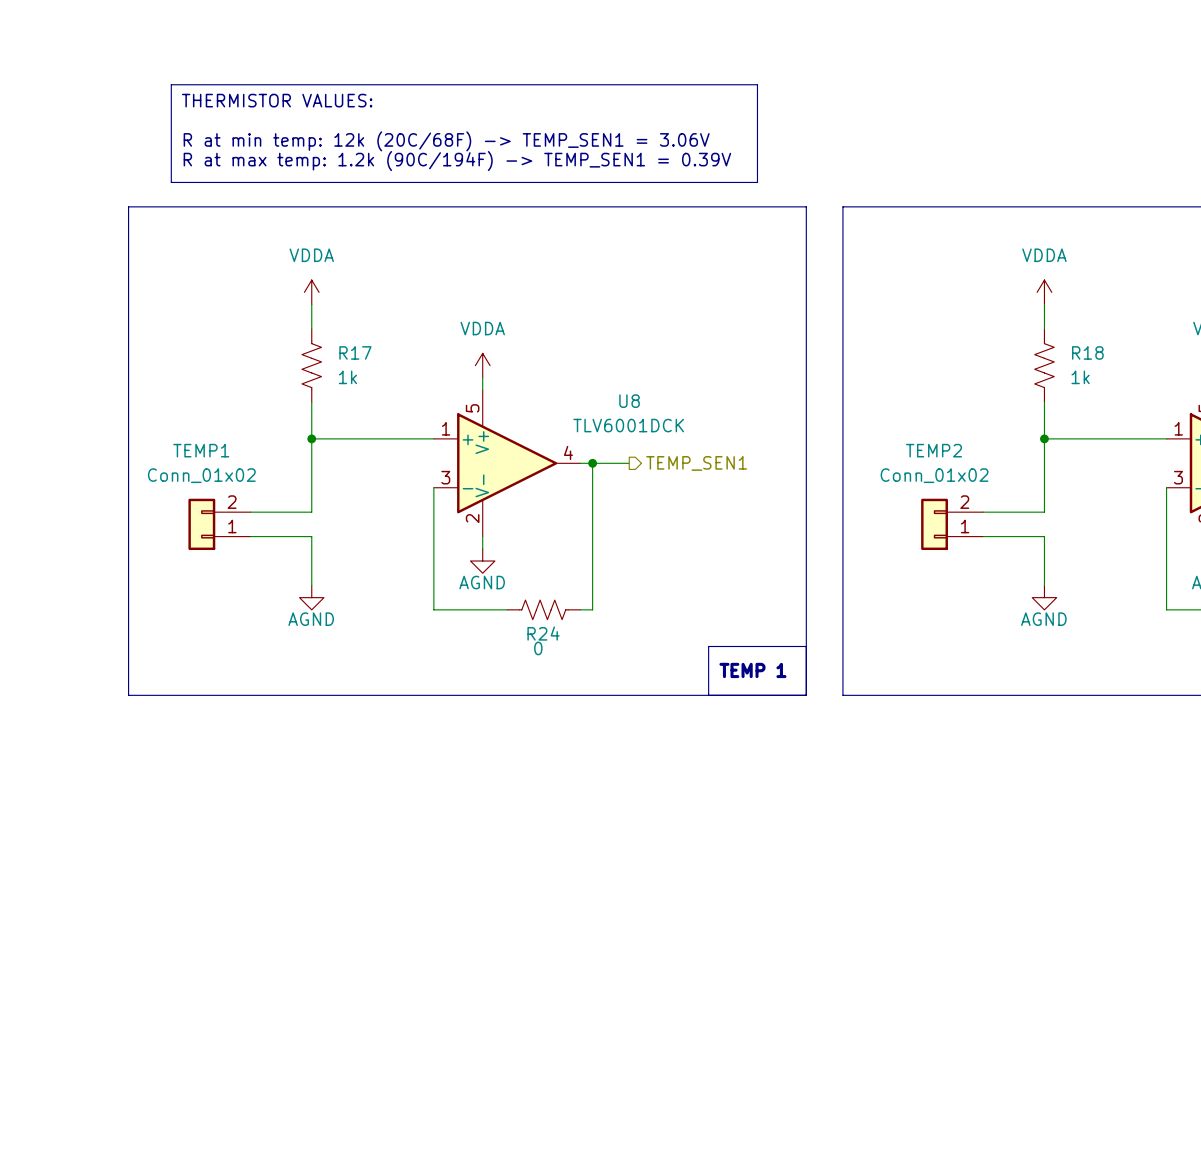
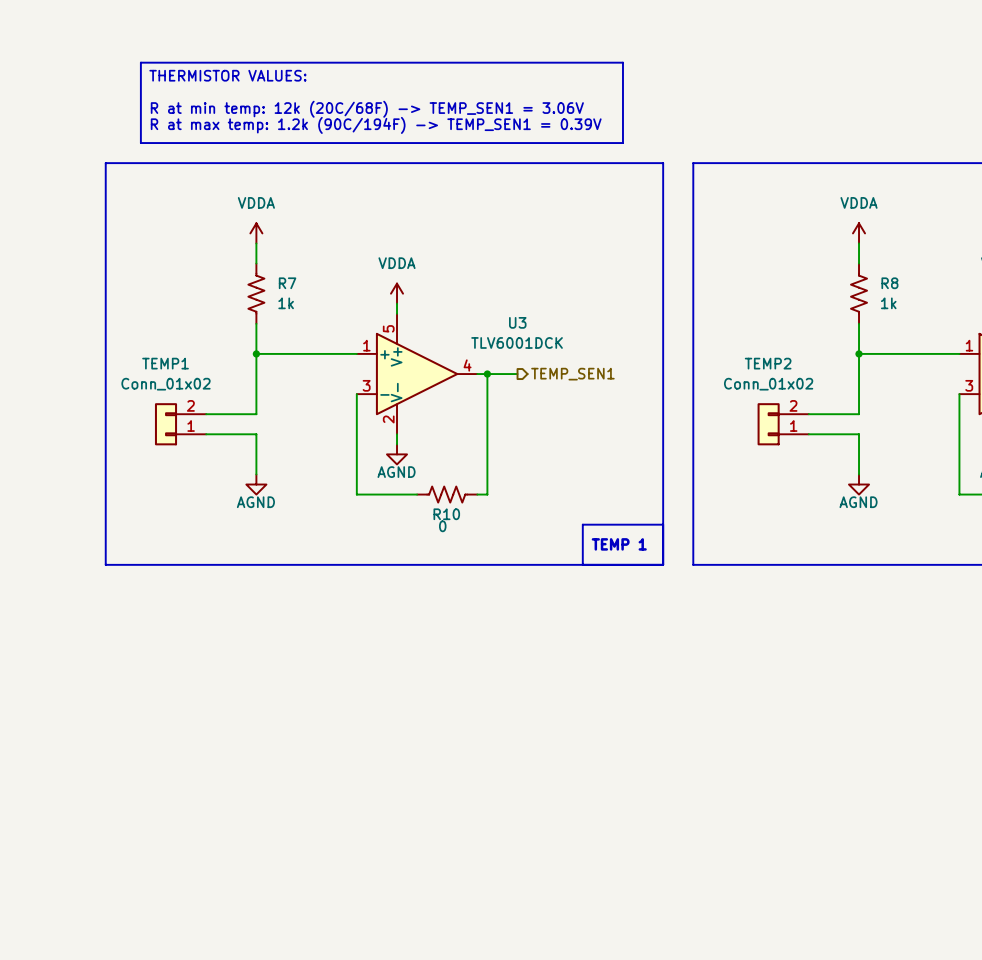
R17 name: R17 (355, 352) -> R7 (287, 283)
R18 name: R18 (1087, 352) -> R8 (889, 283)
U8 name: U8 (629, 401) -> U3 (517, 322)
R24 name: R24 (543, 633) -> R10 (446, 514)

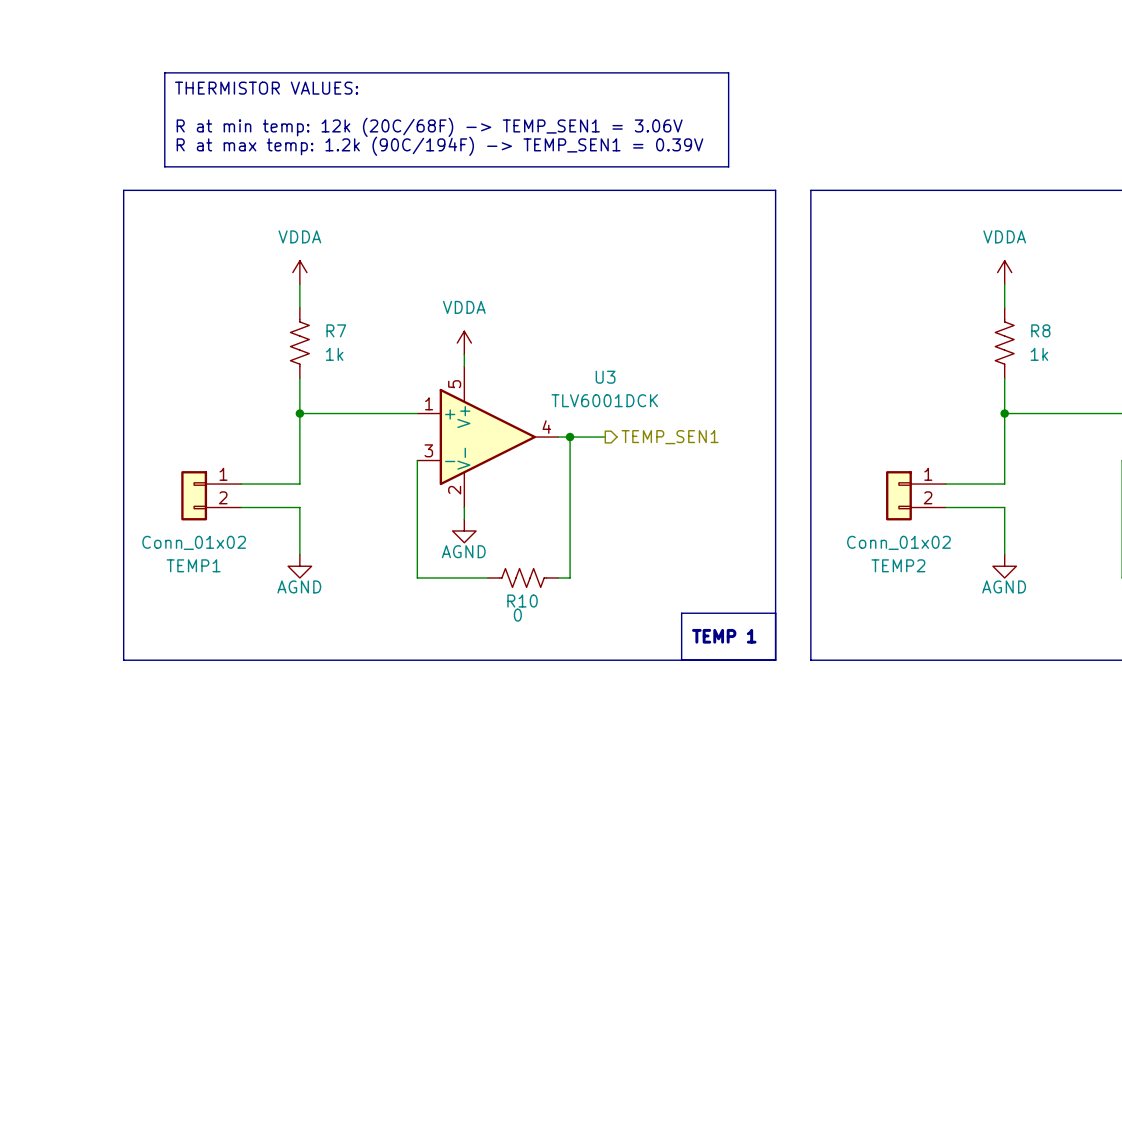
TEMP1 flip: as is (166, 424) -> up-down (194, 495)
TEMP2 flip: as is (768, 424) -> up-down (898, 495)

